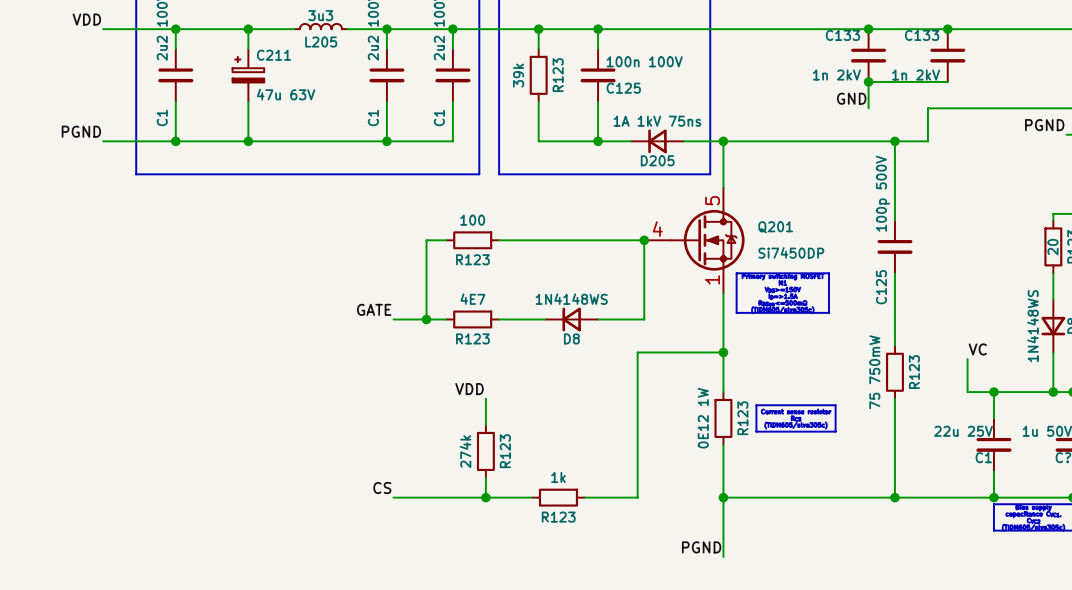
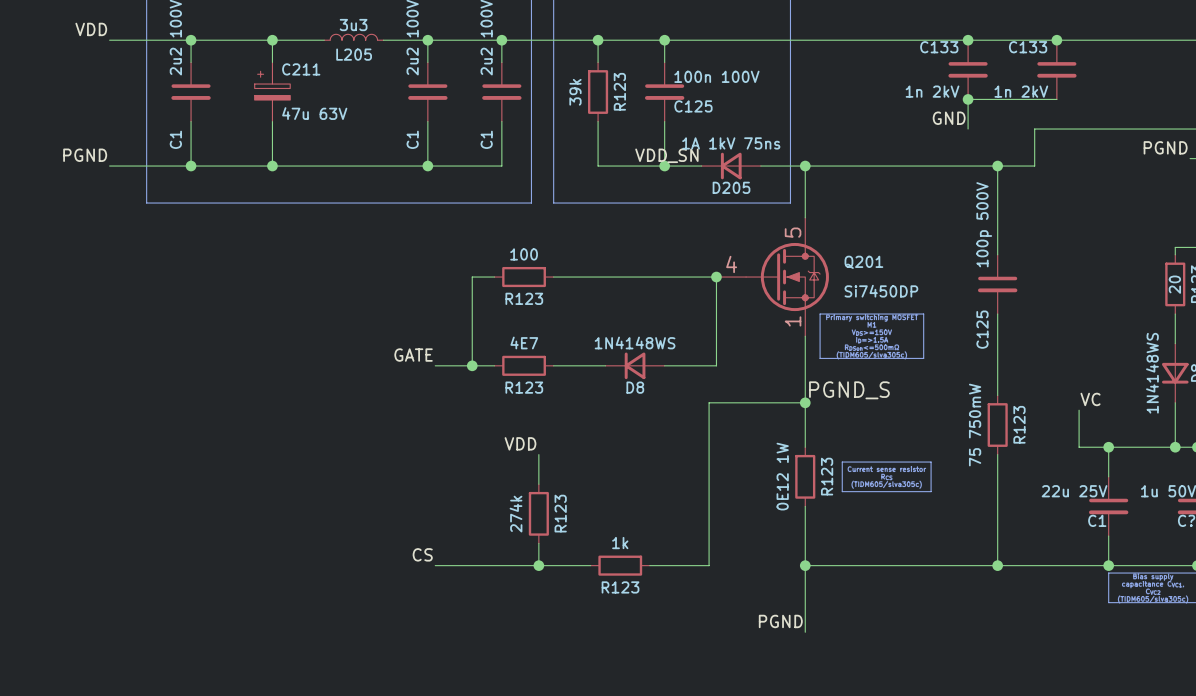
label: none -> VDD_SN (666, 155)
label: none -> PGND_S (849, 390)

